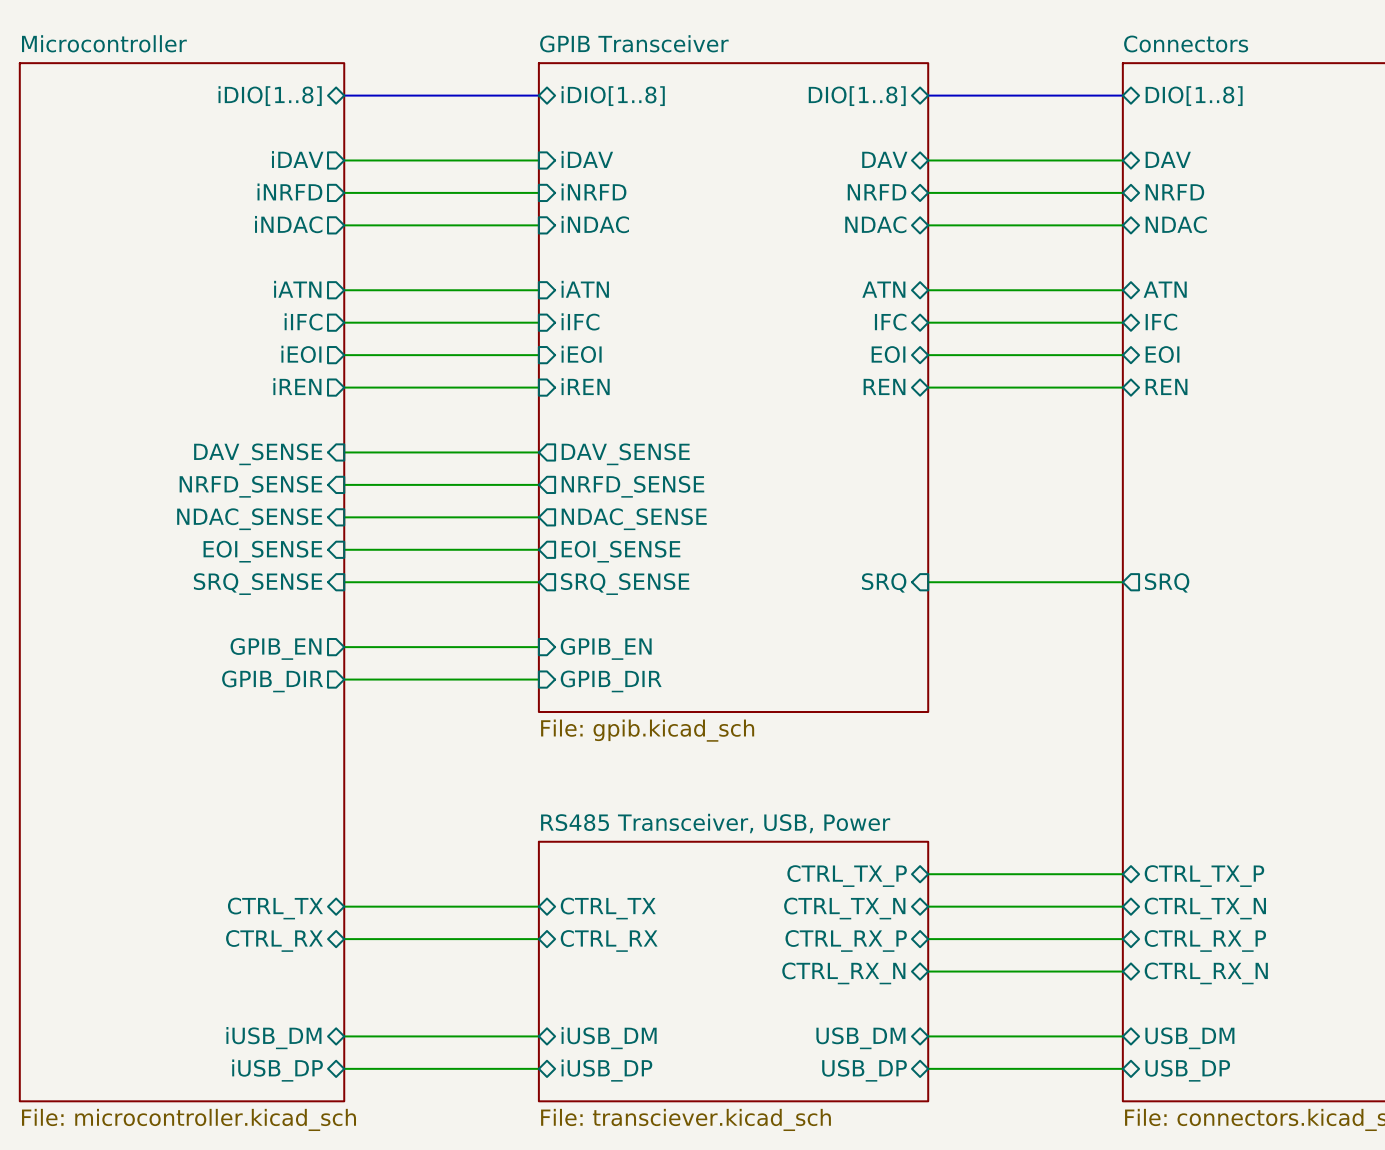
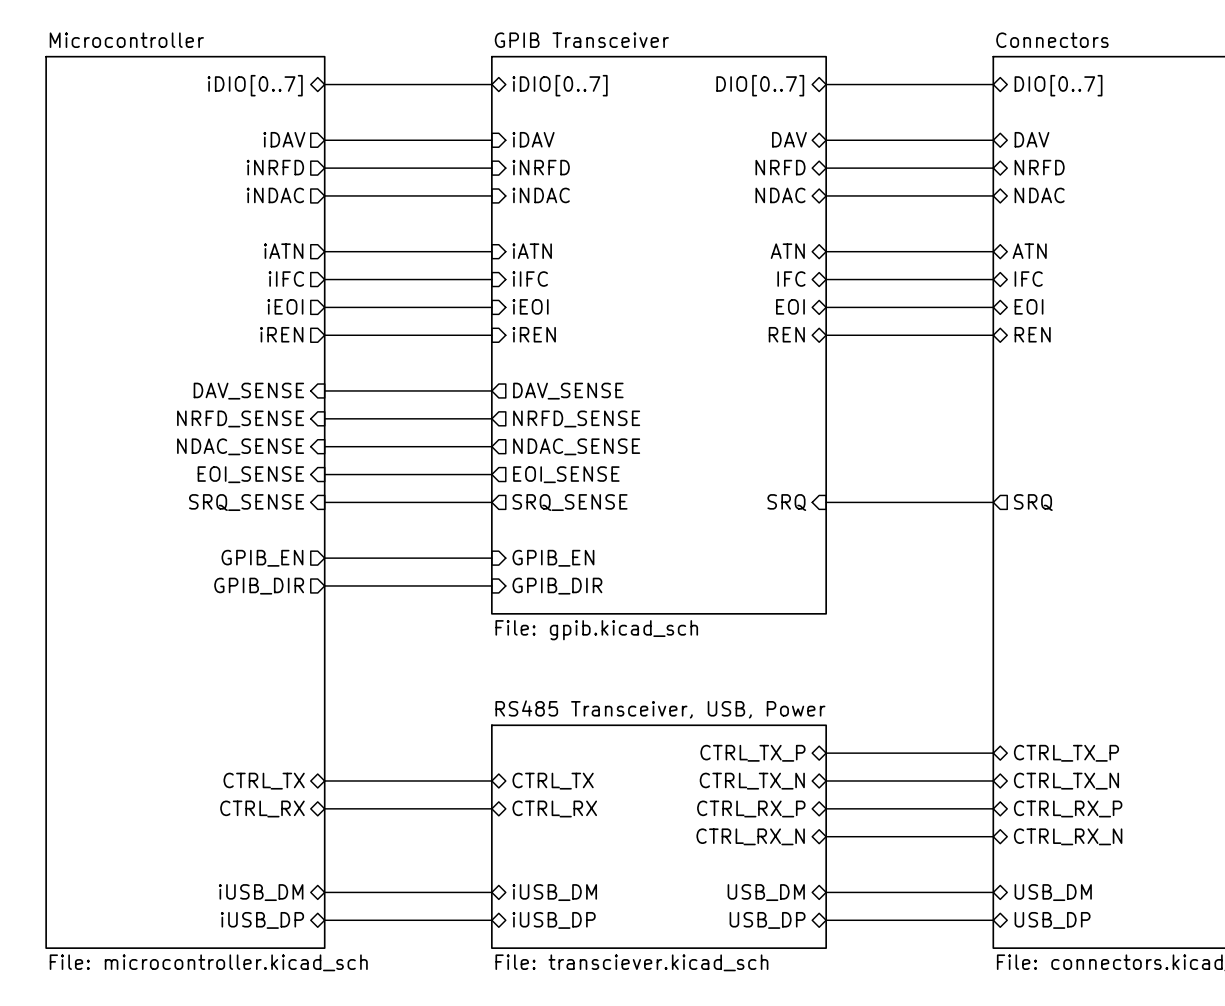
sheet pin: iDIO[1..8] (270, 96) -> iDIO[0..7] (255, 85)
sheet pin: iDIO[1..8] (613, 96) -> iDIO[0..7] (560, 85)
sheet pin: DIO[1..8] (857, 96) -> DIO[0..7] (760, 85)
sheet pin: DIO[1..8] (1194, 96) -> DIO[0..7] (1058, 85)

